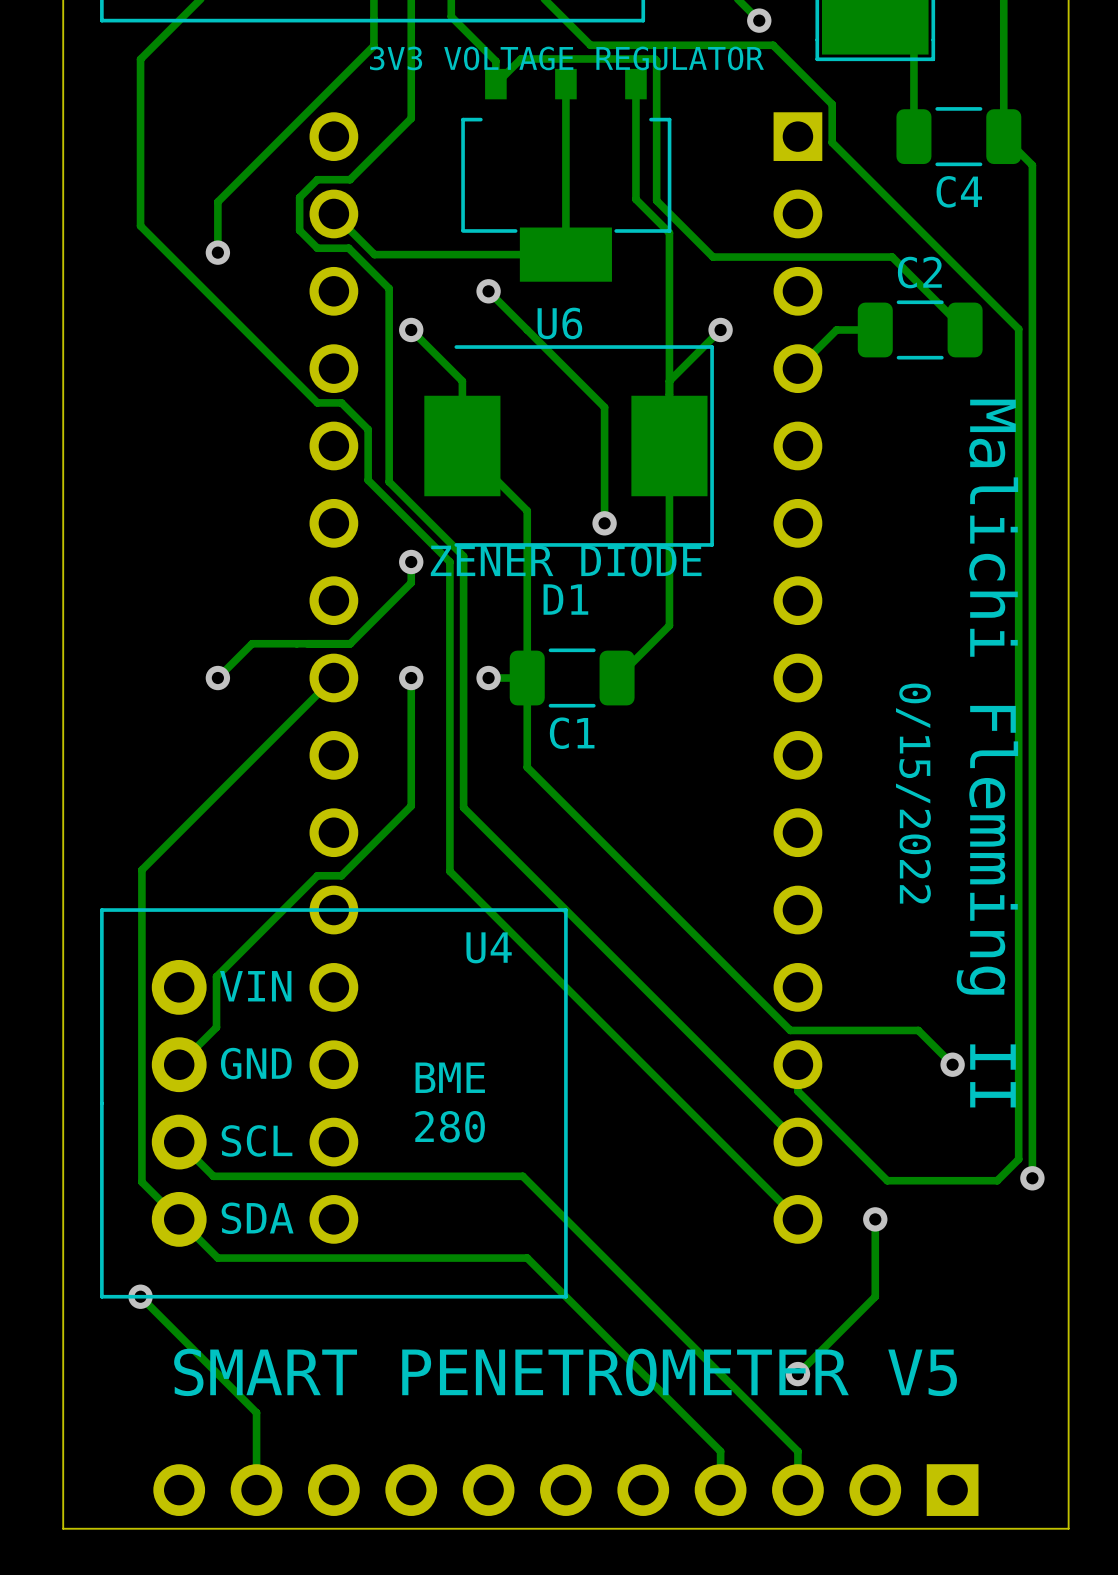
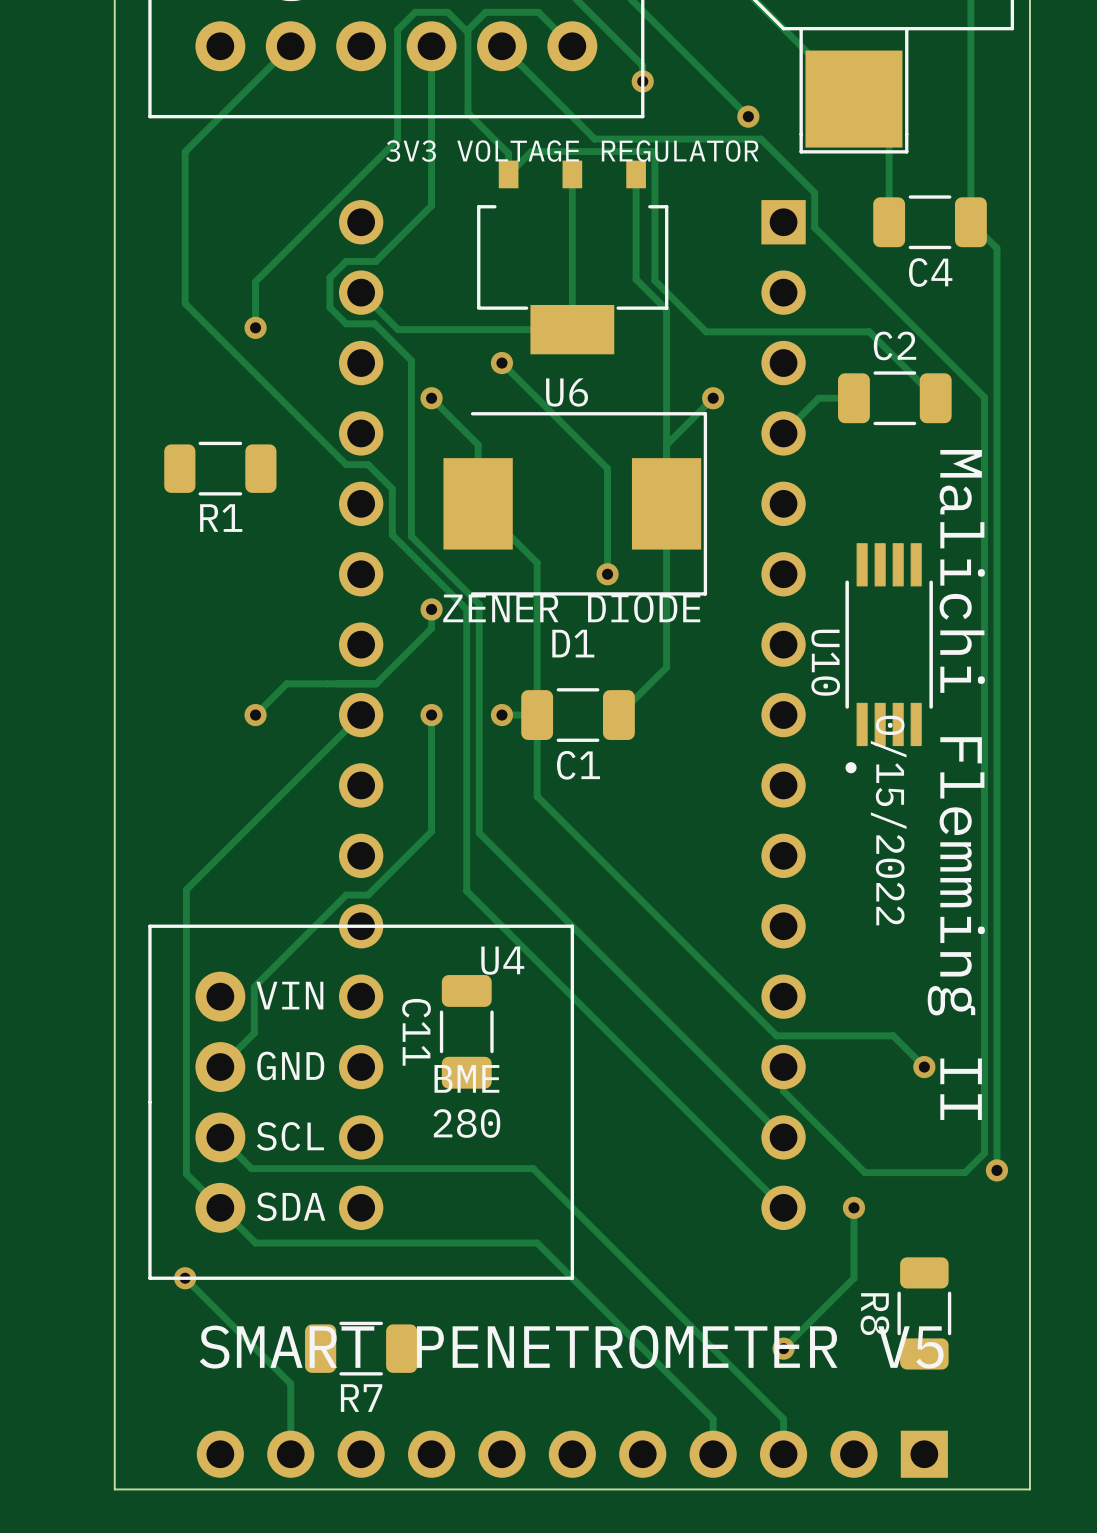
R1: none -> (220, 468)
U10: none -> (889, 658)
C11: none -> (466, 1031)
R8: none -> (924, 1313)
R7: none -> (361, 1348)

